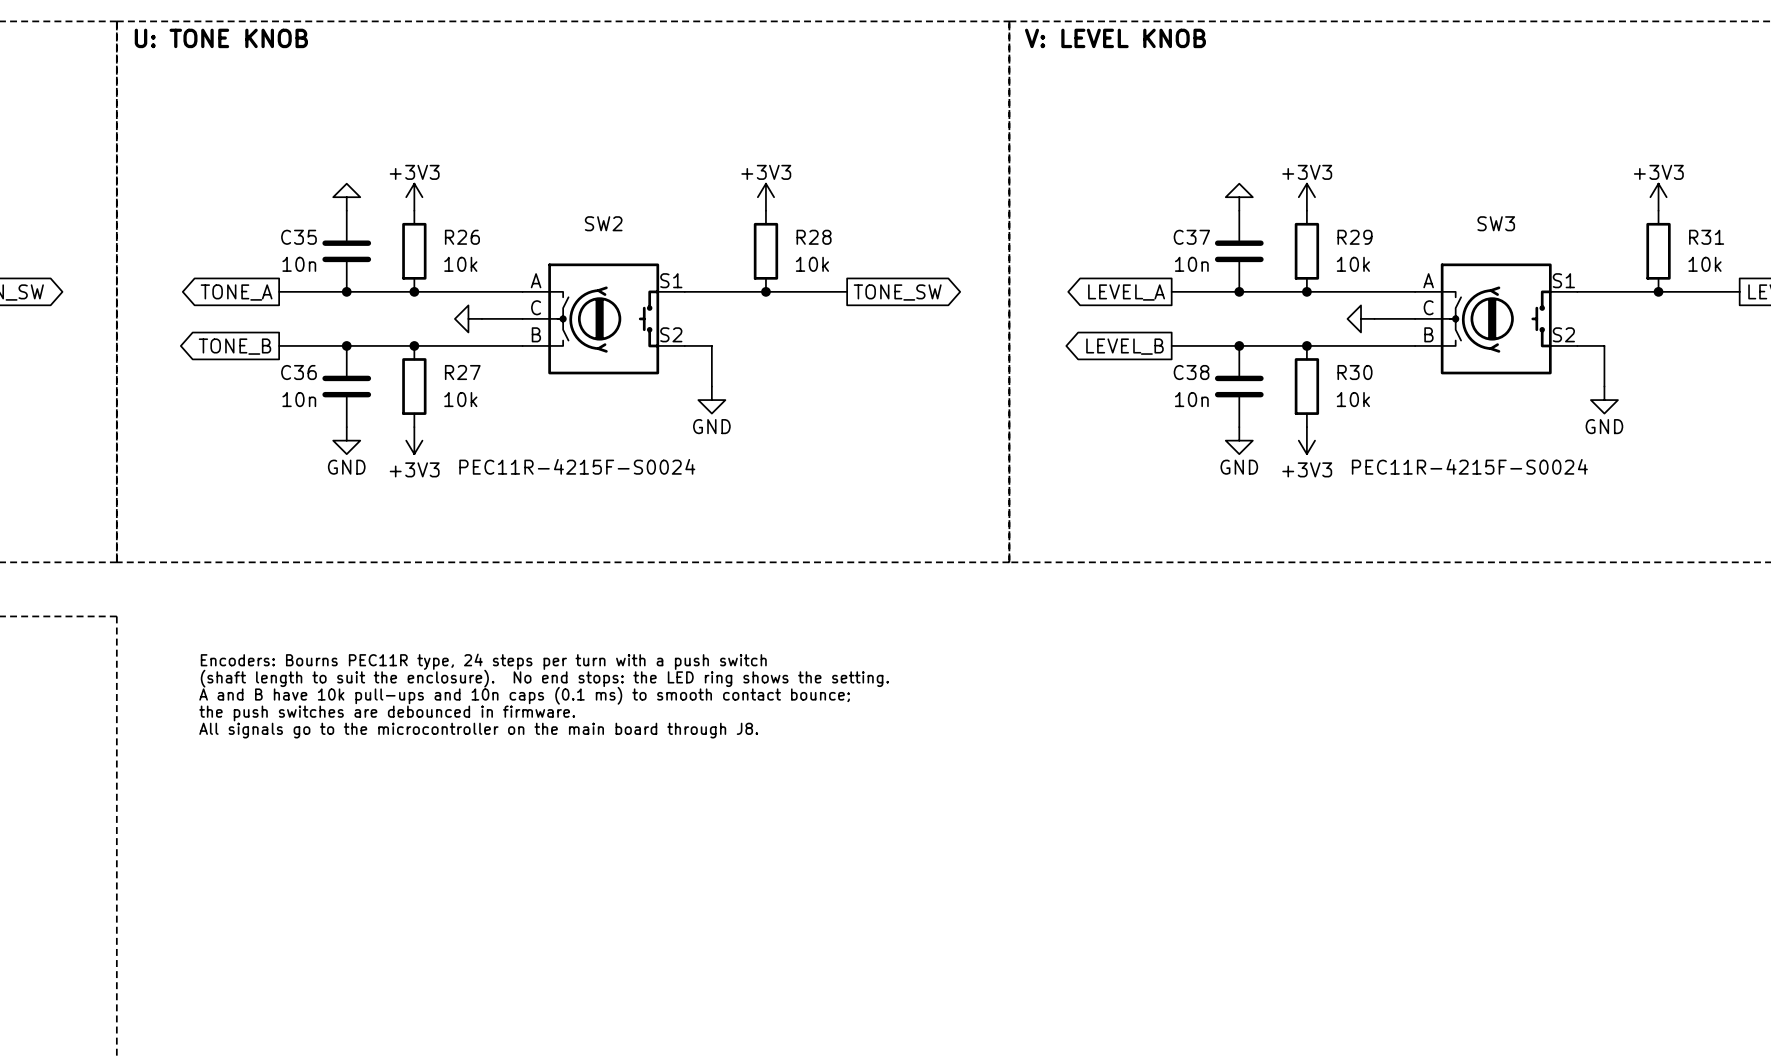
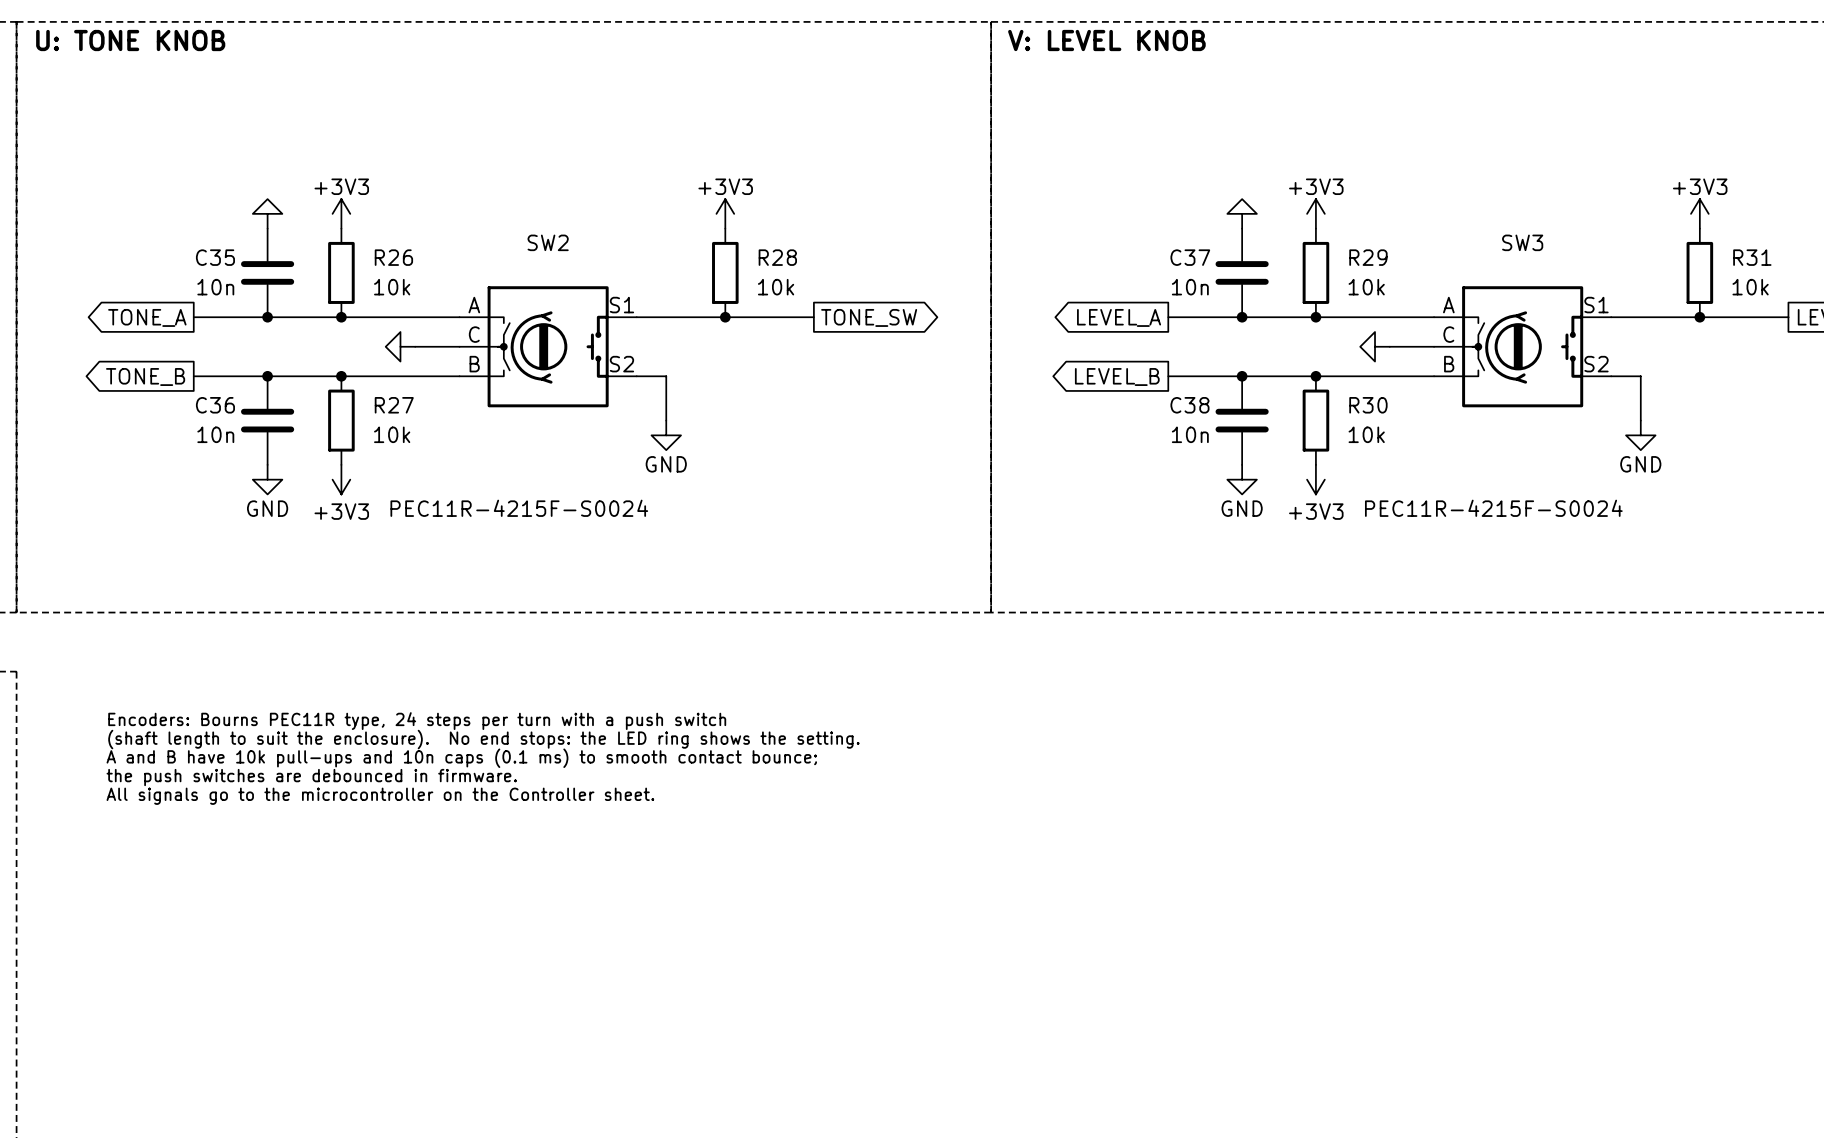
text: All signals go to the microcontroller on the main board through J8. (478, 730) -> All signals go to the microcontroller on the Controller sheet. (380, 796)

